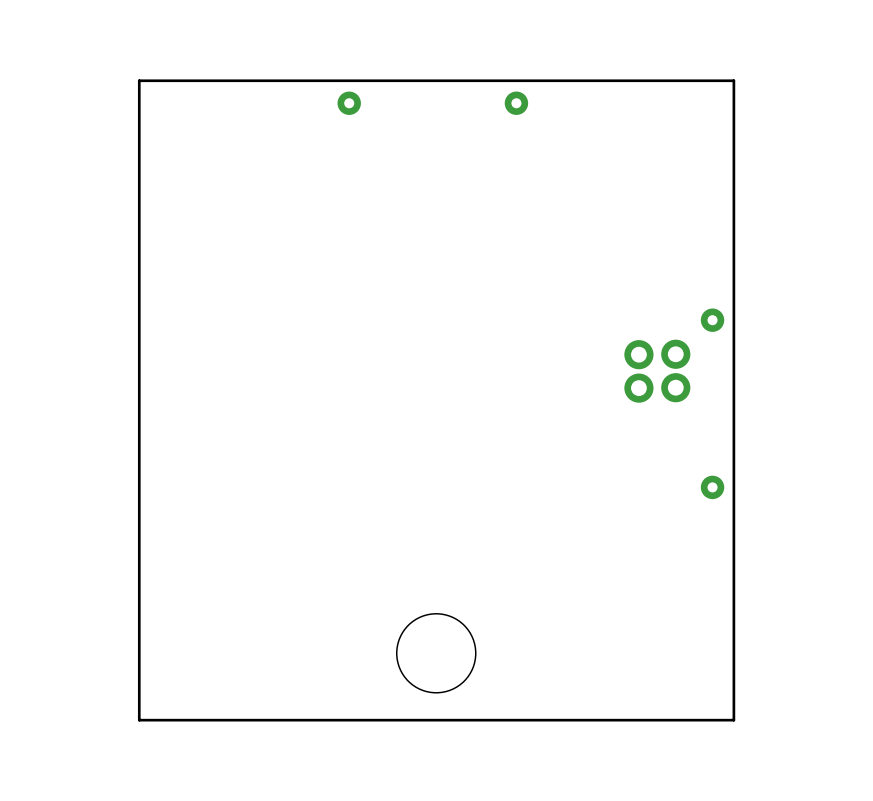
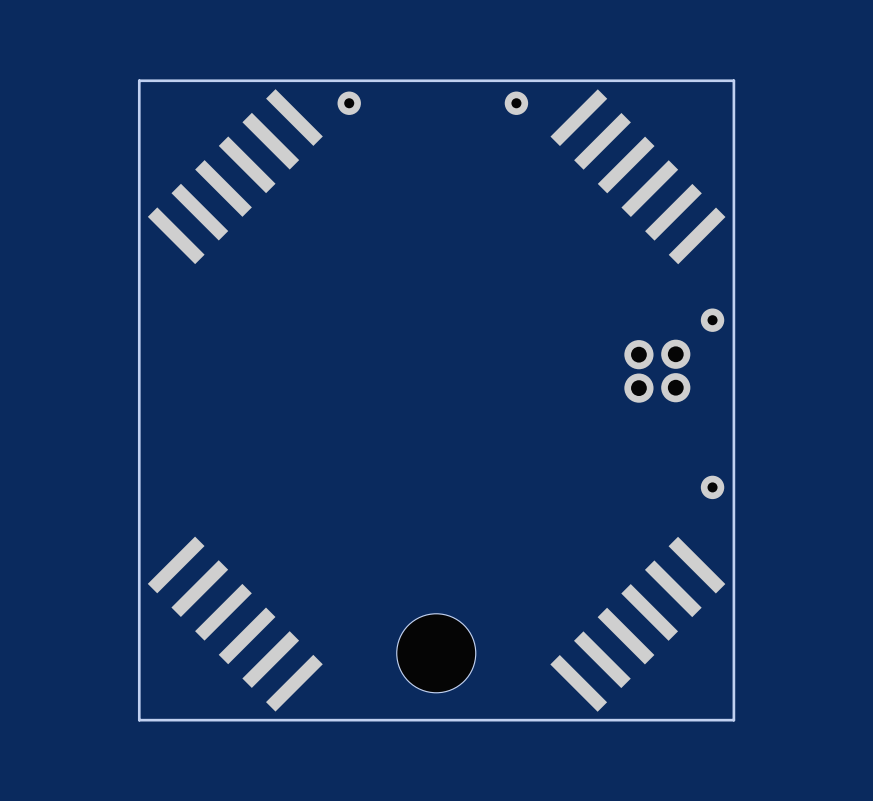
part: none -> (235, 176)
part: none -> (637, 176)
part: none -> (235, 624)
part: none -> (637, 624)

